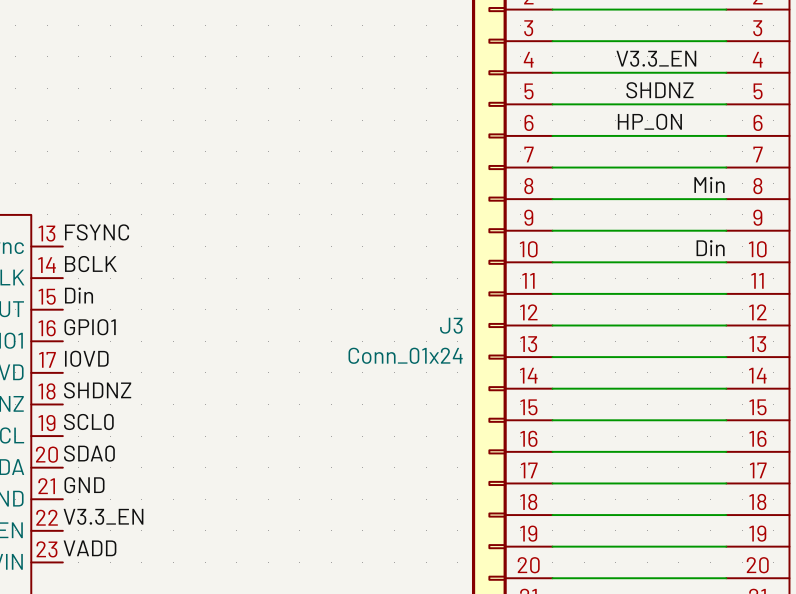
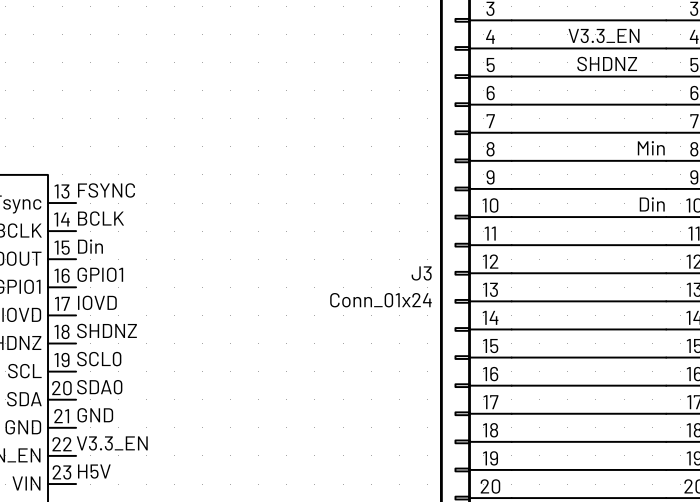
label: HP_ON (649, 121) -> none
label: VADD (90, 548) -> H5V (94, 471)

